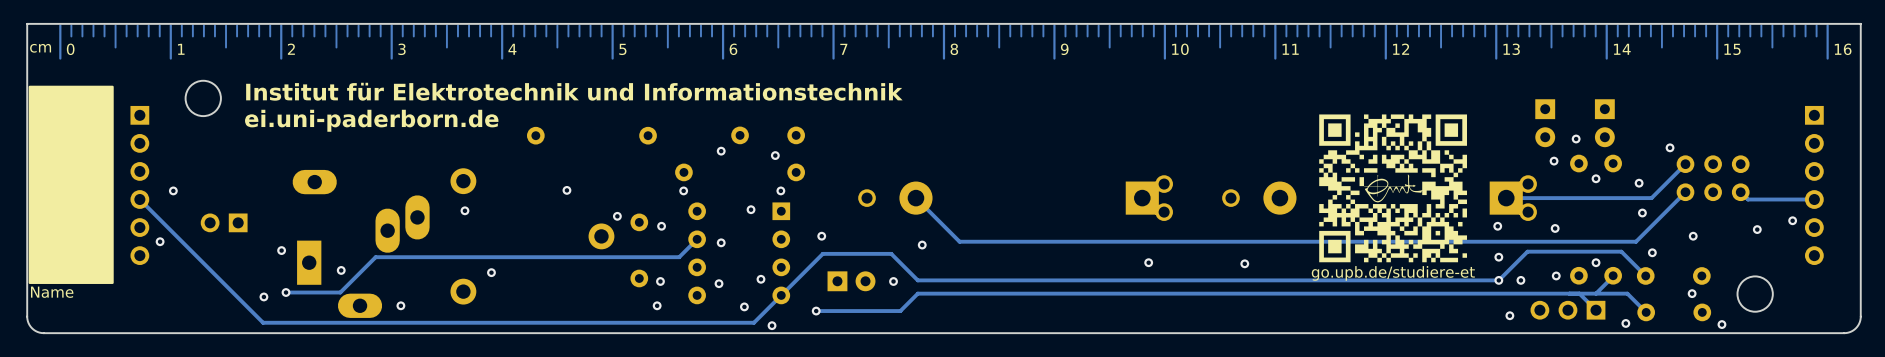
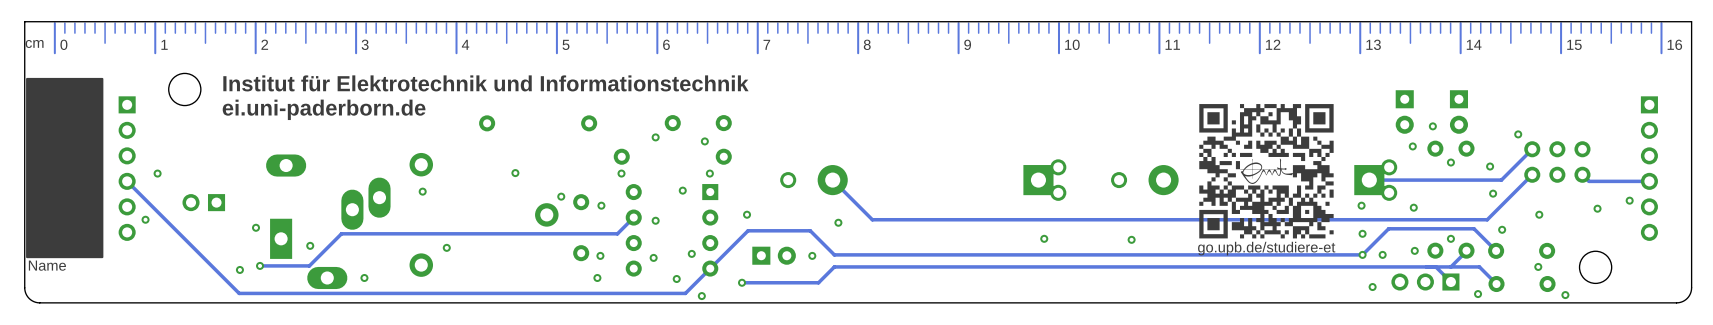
drawing shape: [30, 24, 1852, 60] -> [25, 22, 1683, 55]

